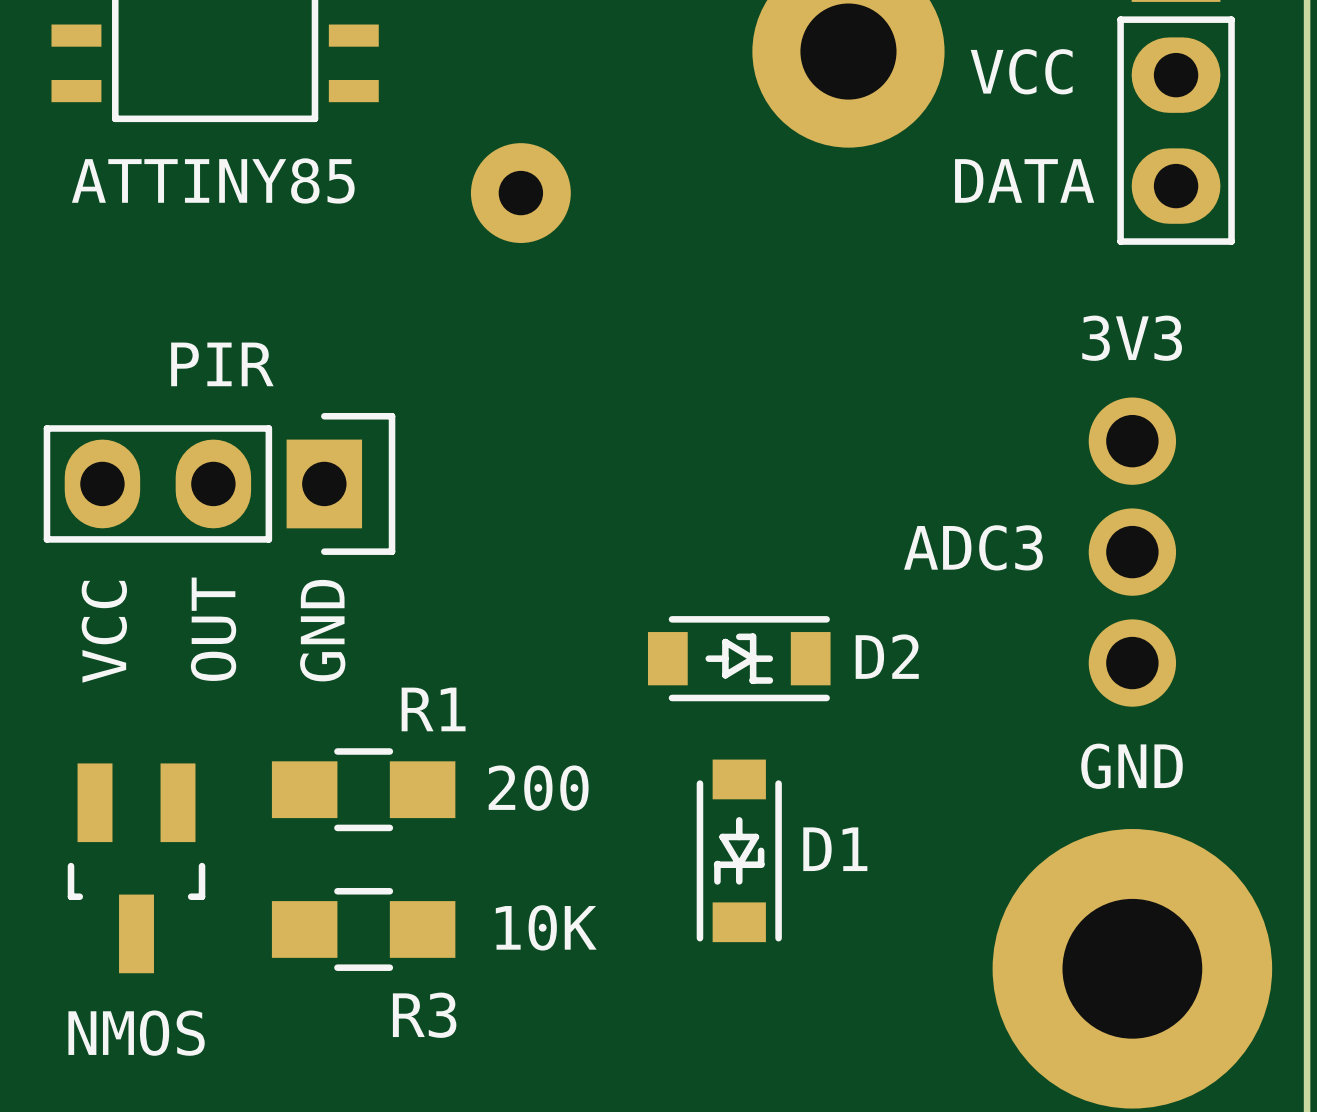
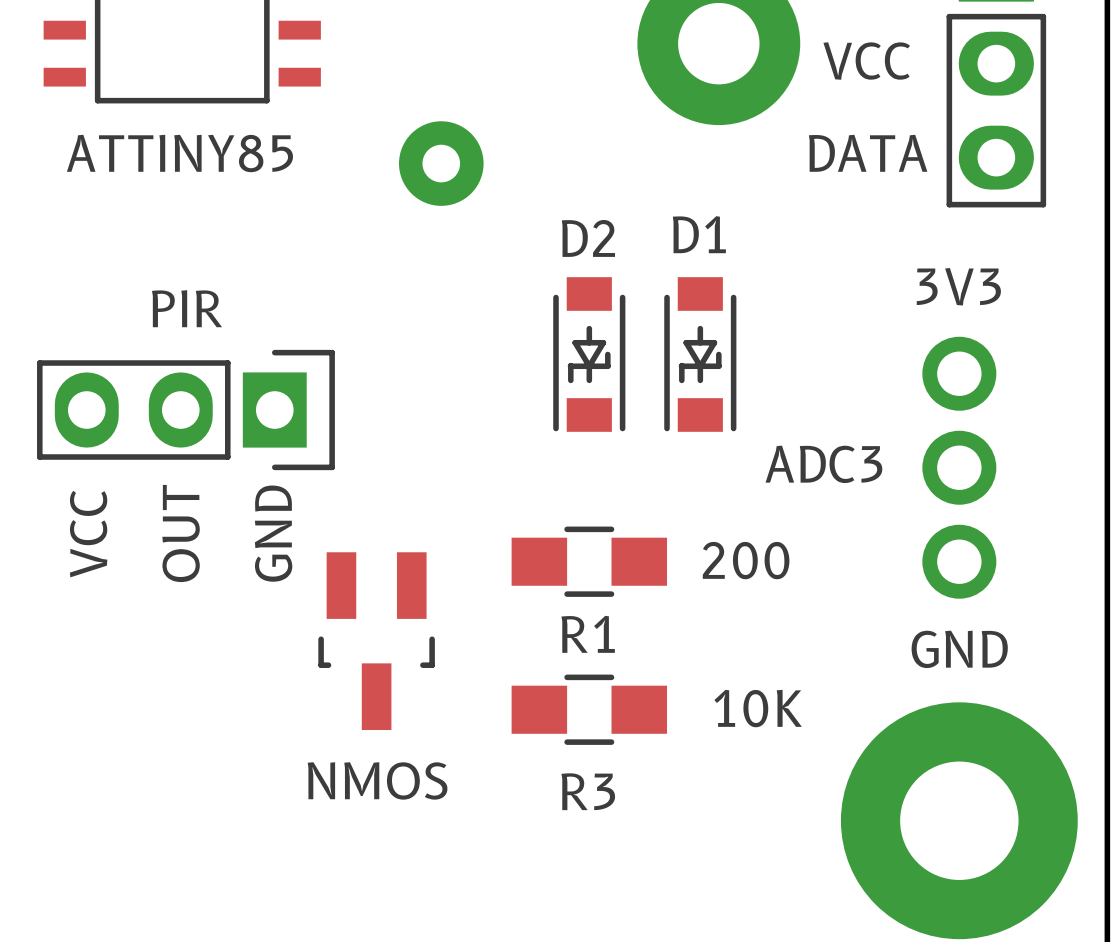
D2 name position: D2 (887, 656) -> D2 (588, 238)
D2 rotation: 0° (739, 658) -> 90° clockwise (589, 354)
D2 position: (739, 658) -> (589, 354)
R1 name position: R1 (433, 709) -> R1 (588, 634)
R1 value position: 200 (538, 788) -> 200 (746, 560)
R1 position: (363, 789) -> (589, 561)
D1 name position: D1 (835, 849) -> D1 (699, 234)
D1 position: (739, 850) -> (700, 354)
part position: (136, 868) -> (376, 641)
R3 value position: 10K (546, 927) -> 10K (758, 708)
R3 position: (363, 929) -> (589, 709)
R3 name position: R3 (424, 1015) -> R3 (588, 791)

